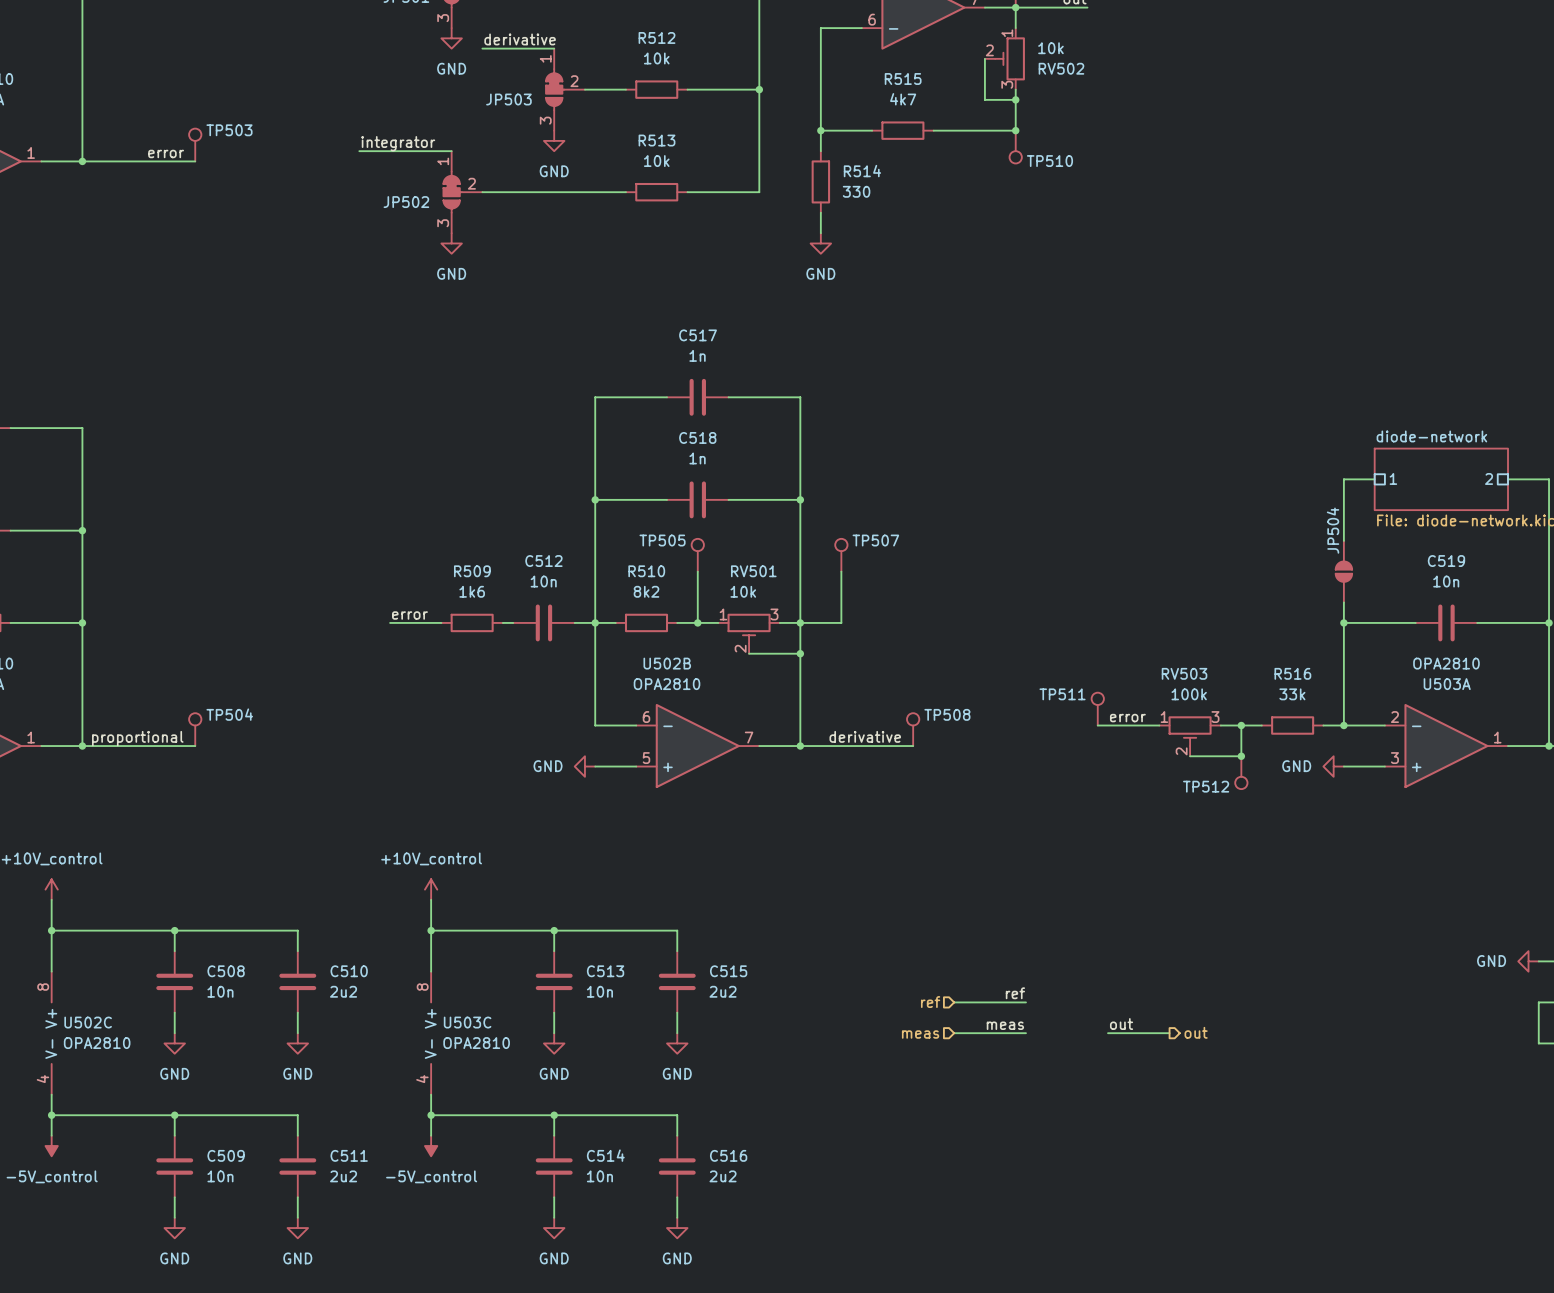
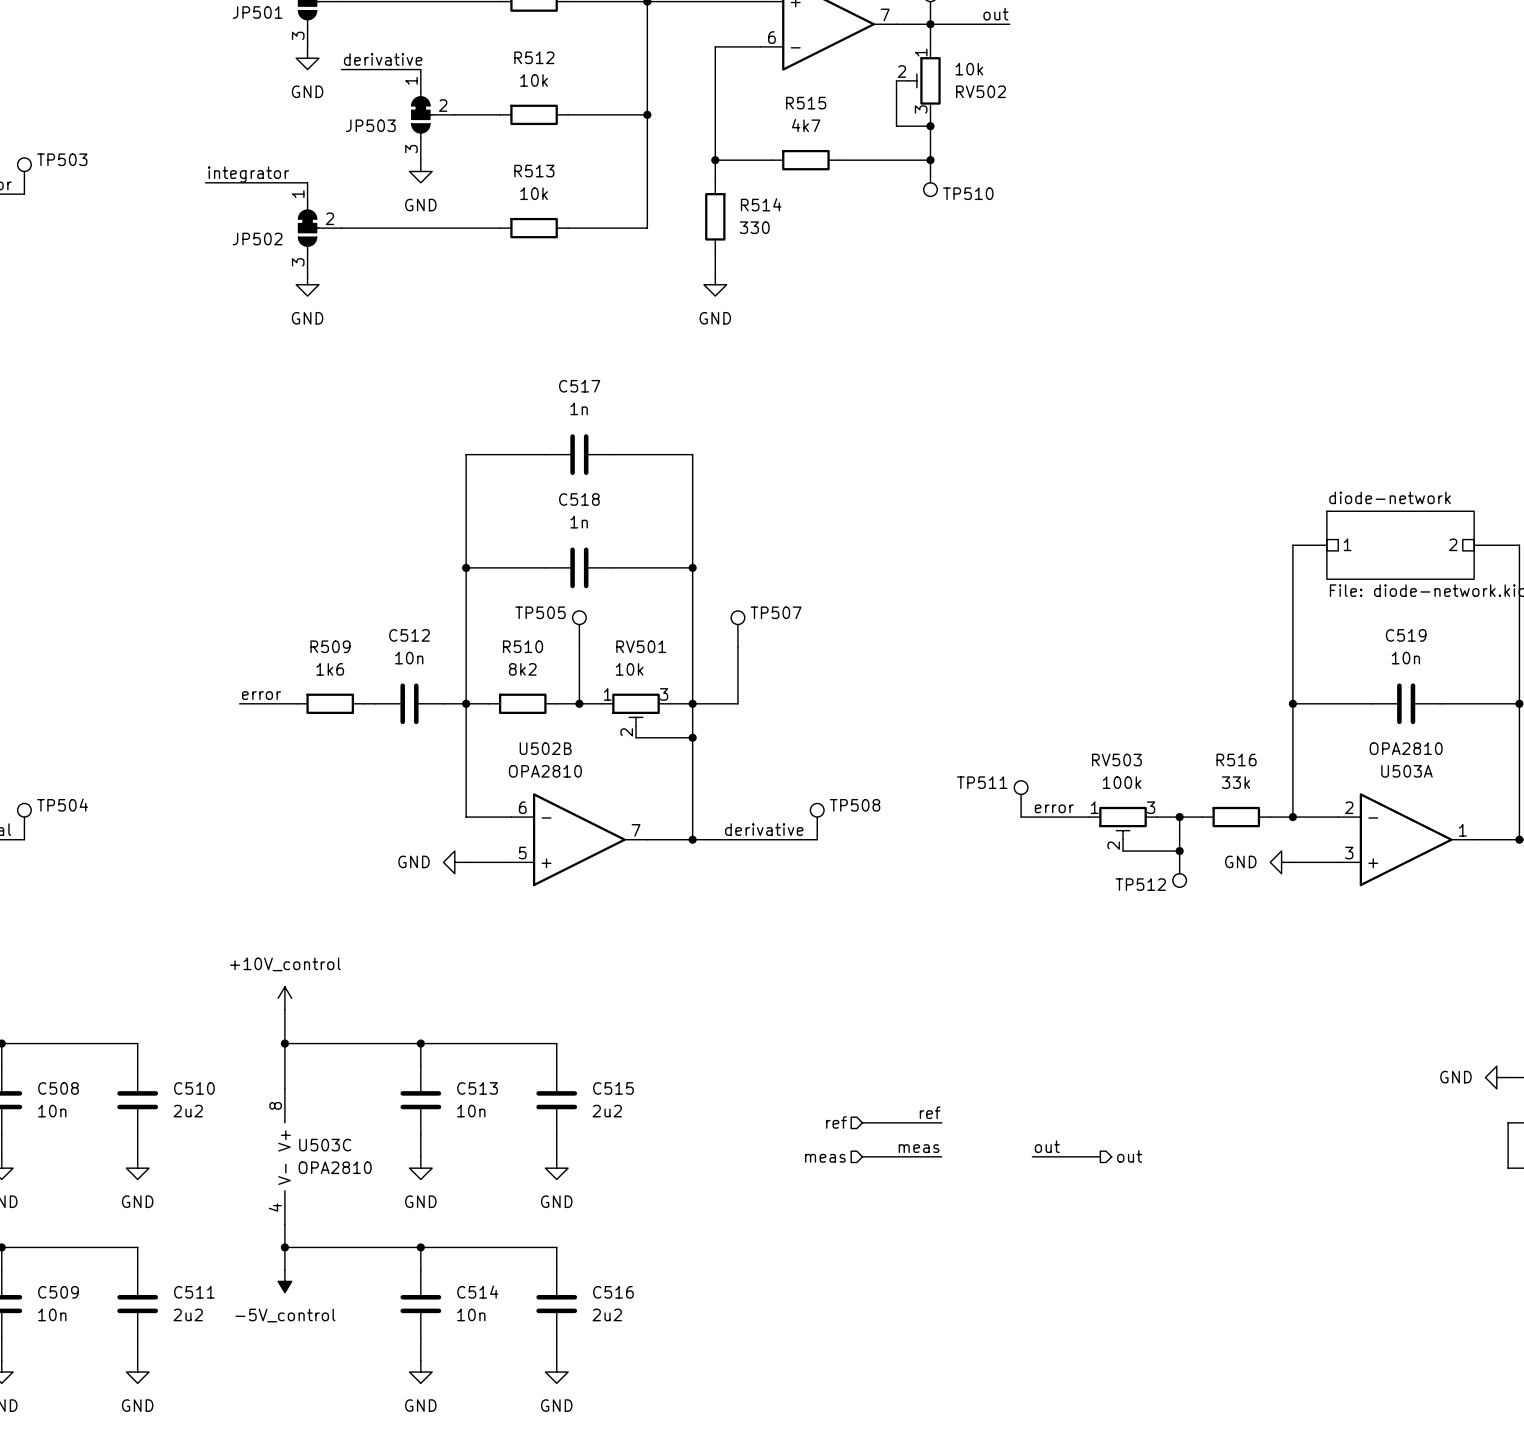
JP504: (1343, 571) -> none

